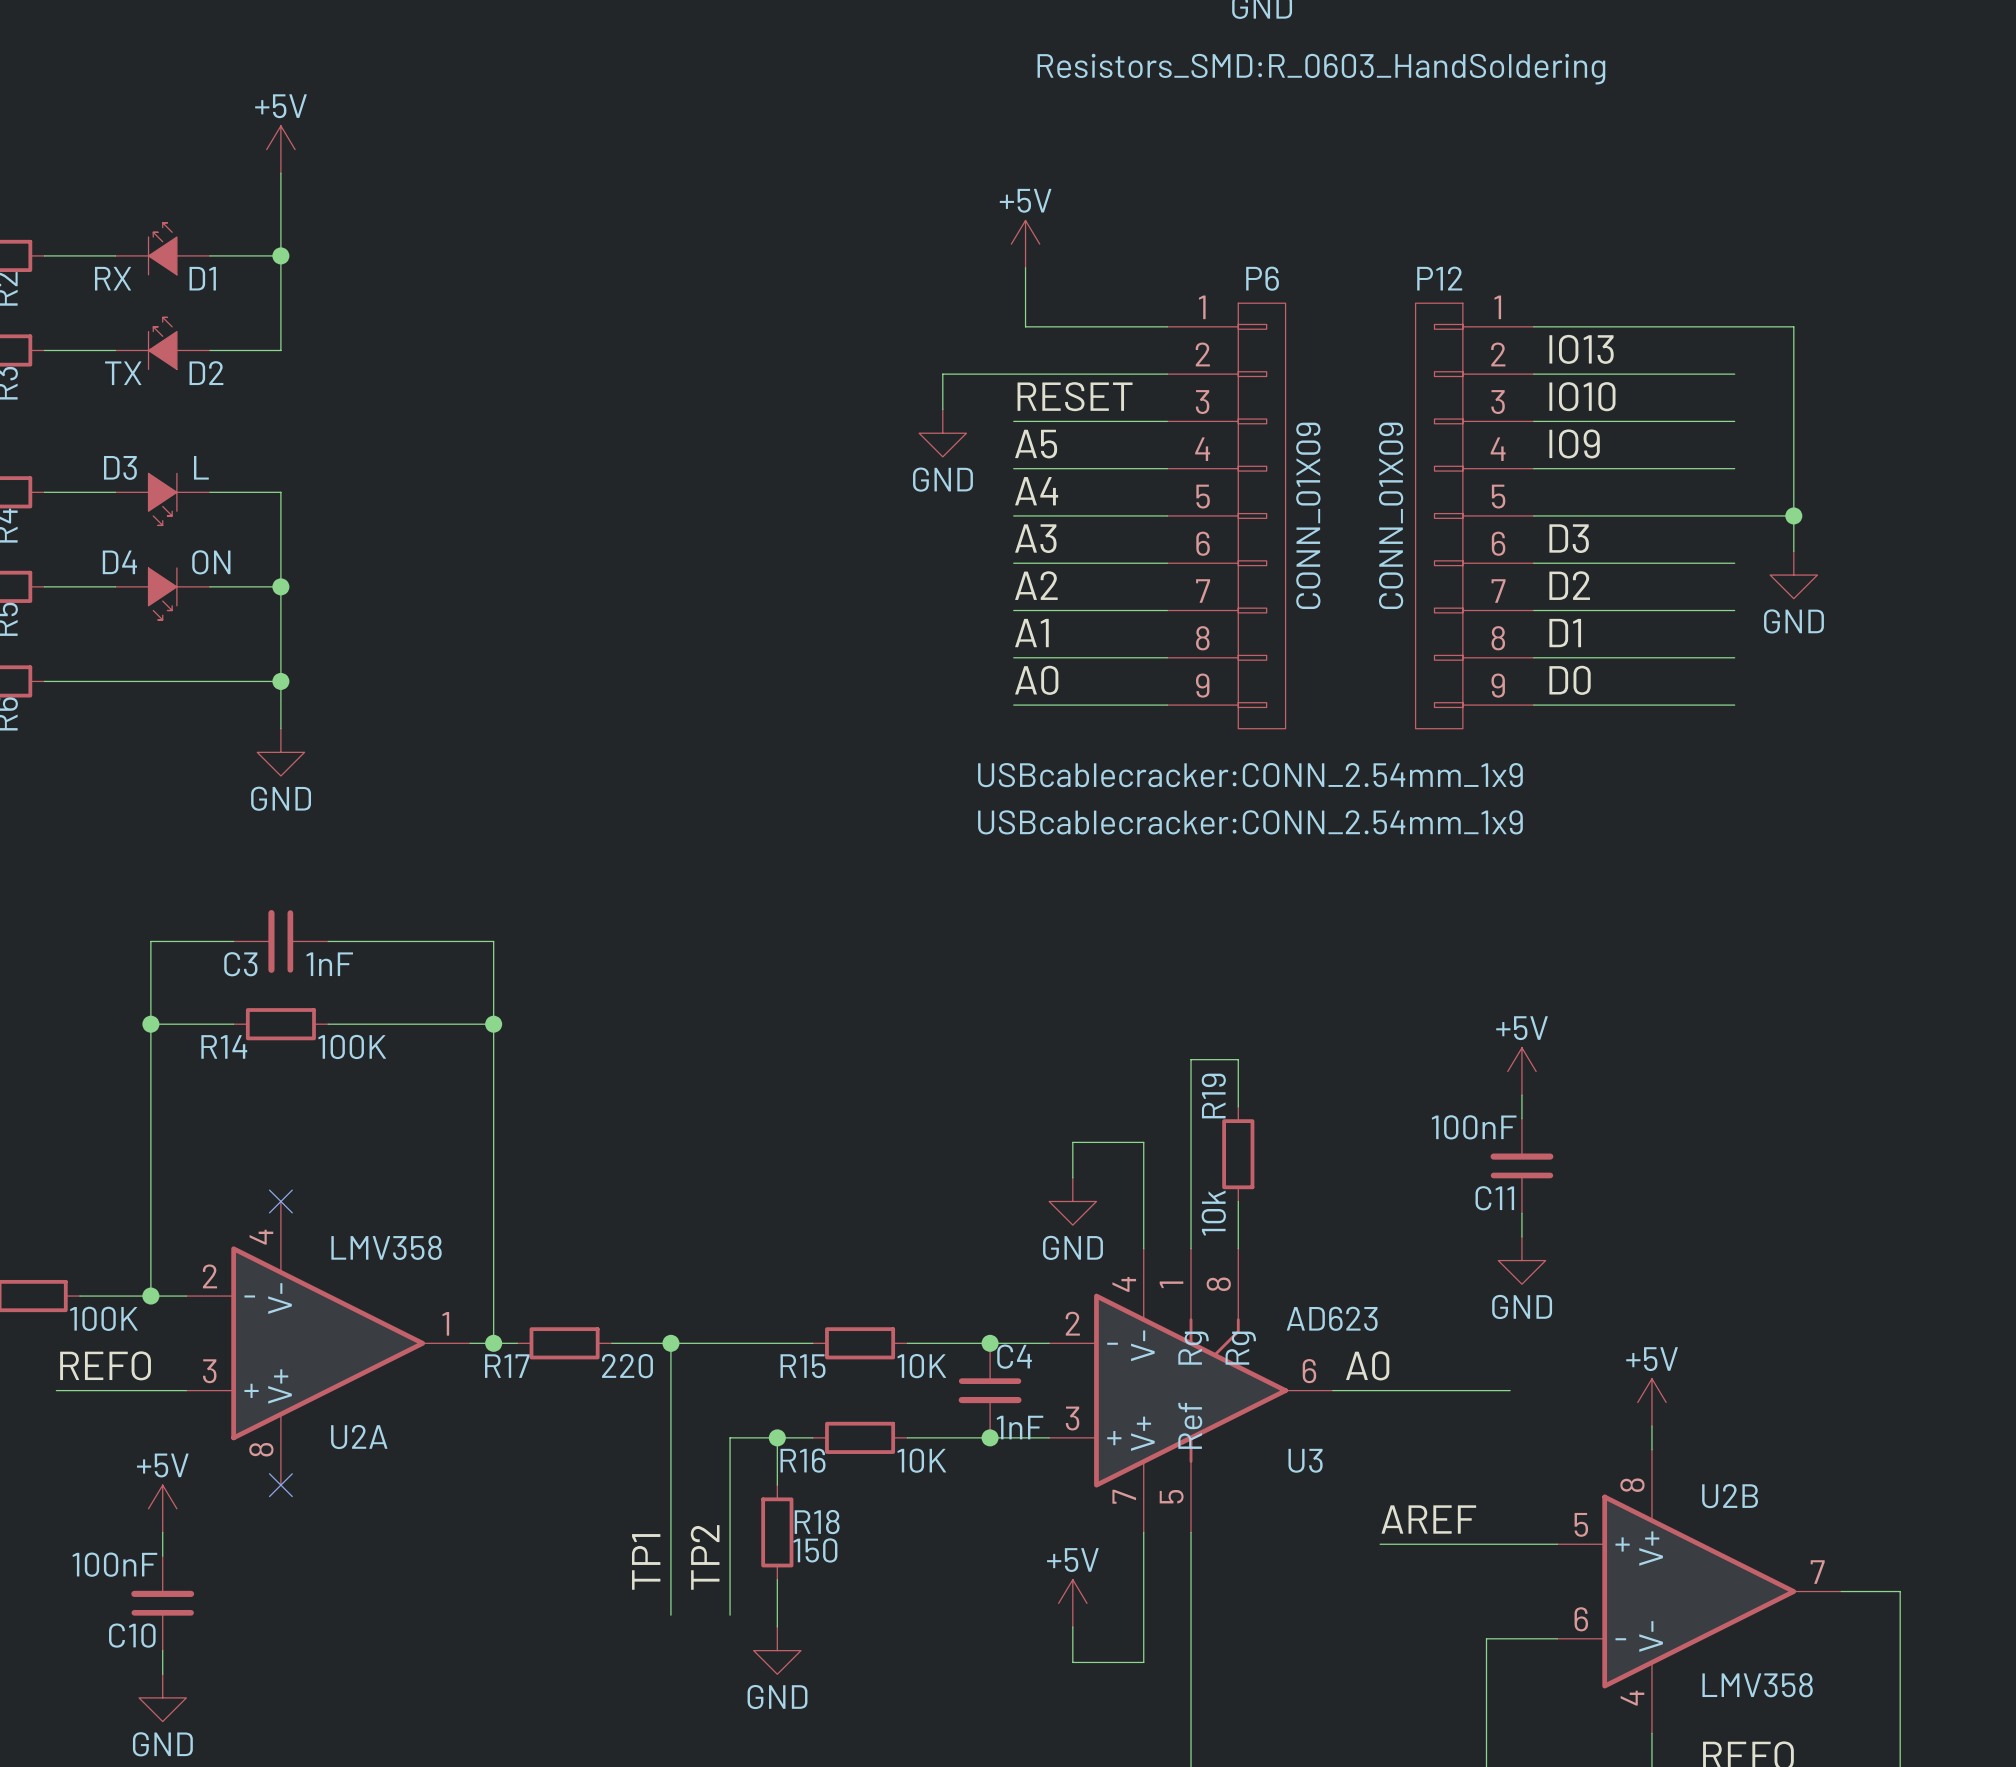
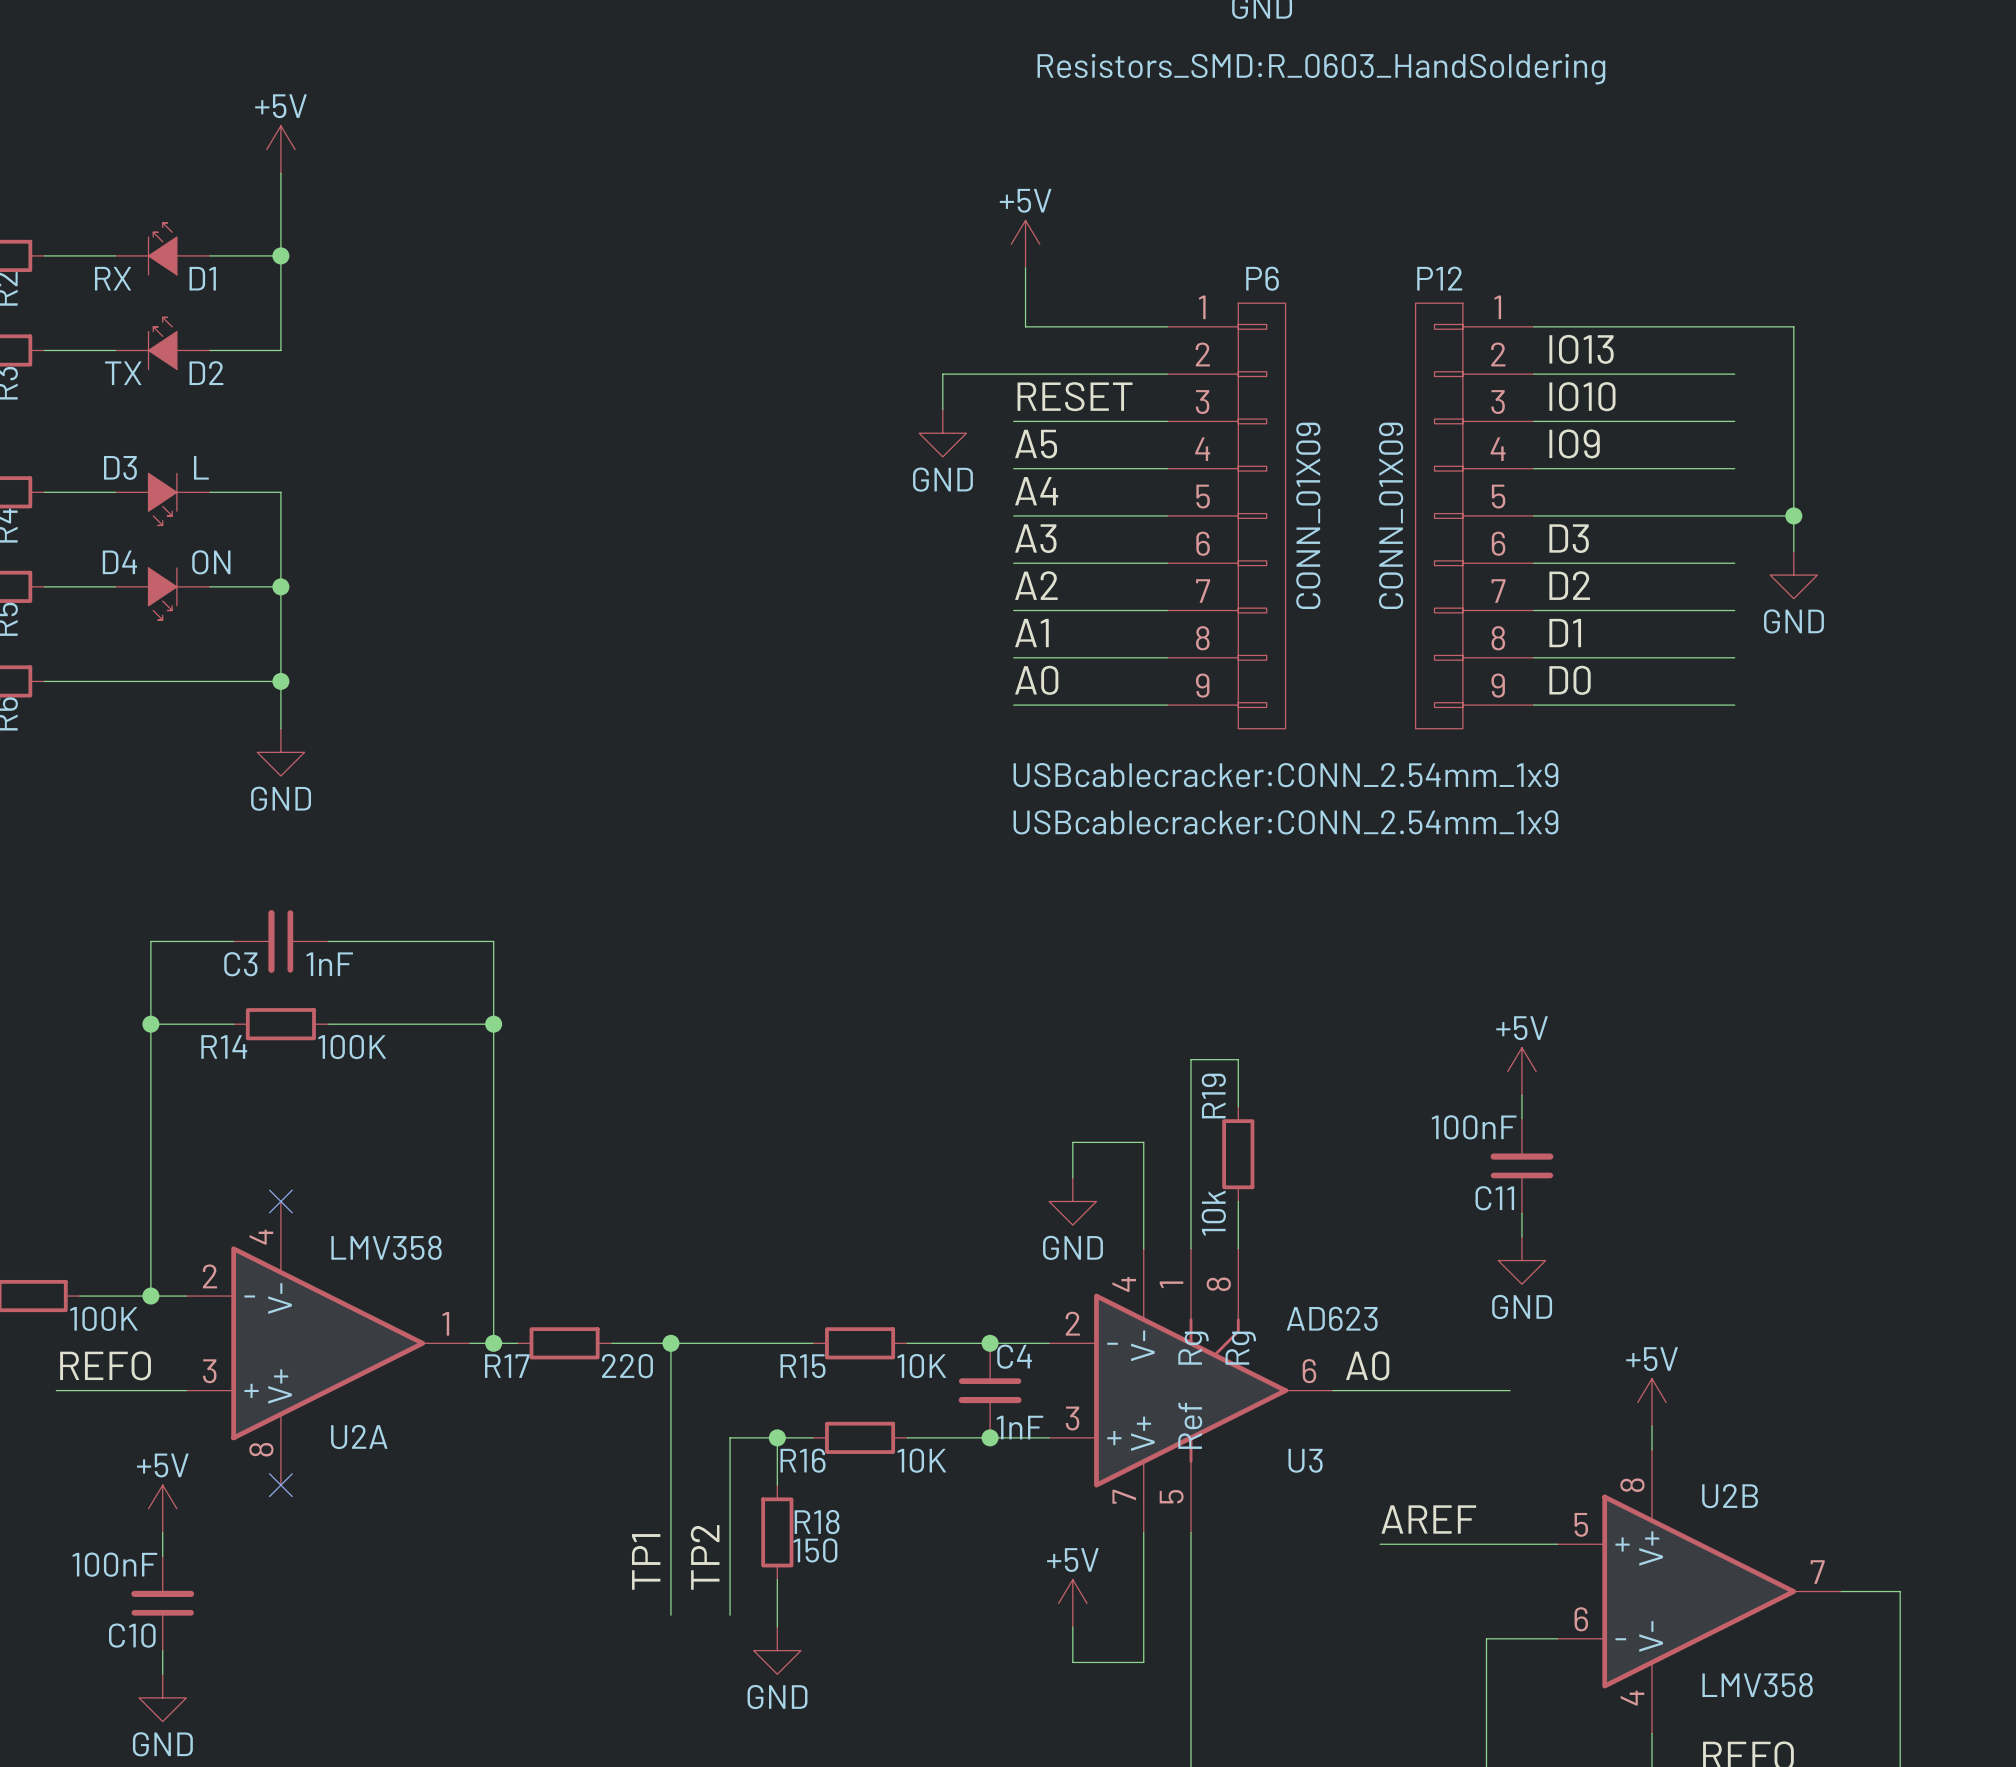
P6 text position: USBcablecracker:CONN_2.54mm_1x9 (1250, 775) -> USBcablecracker:CONN_2.54mm_1x9 (1285, 775)
P12 text position: USBcablecracker:CONN_2.54mm_1x9 (1250, 822) -> USBcablecracker:CONN_2.54mm_1x9 (1285, 822)

